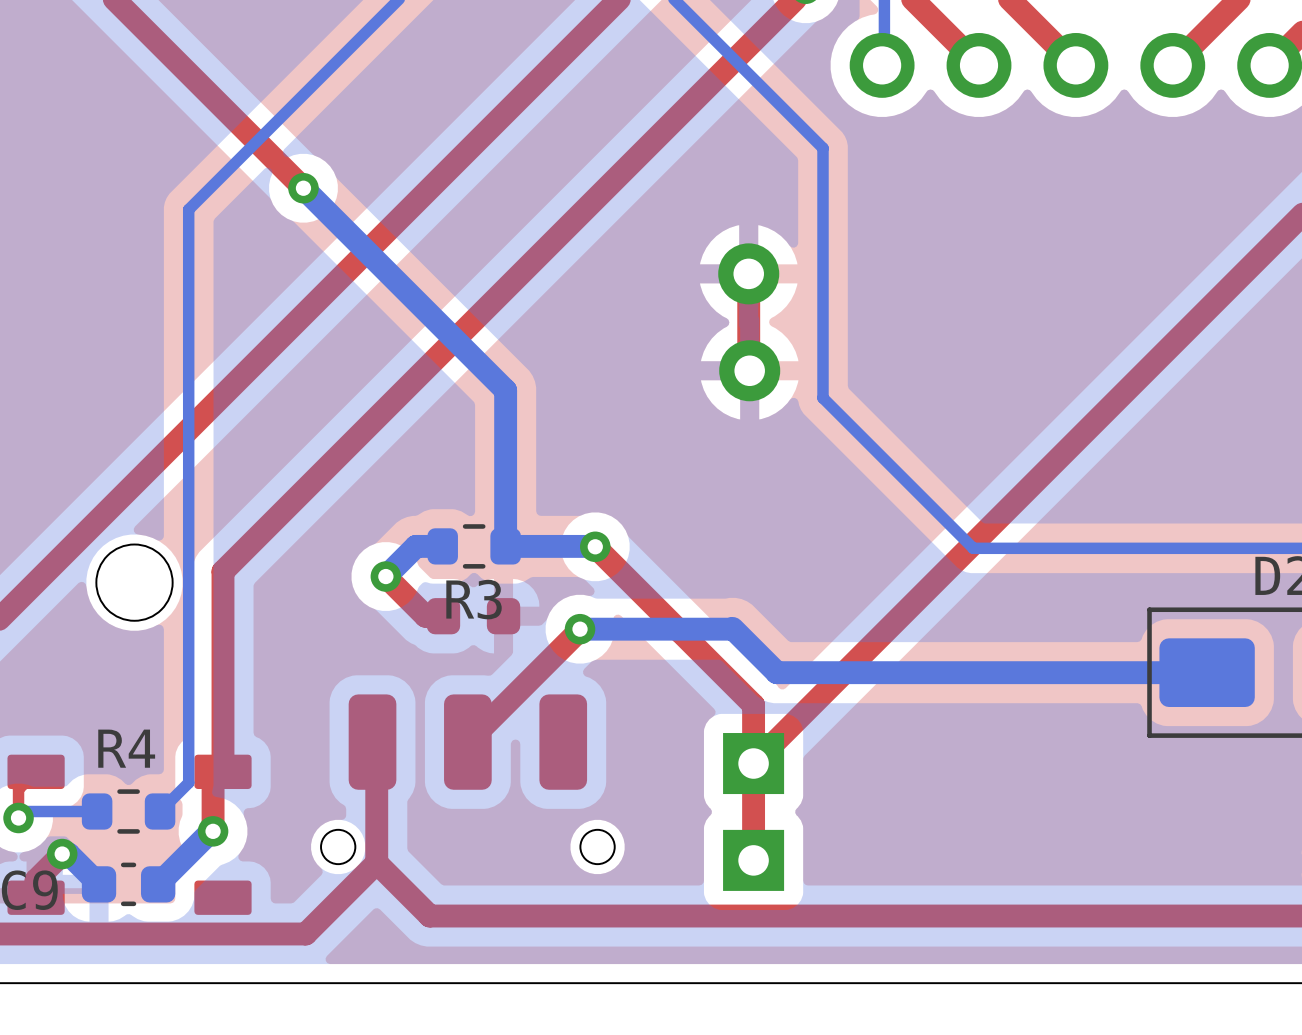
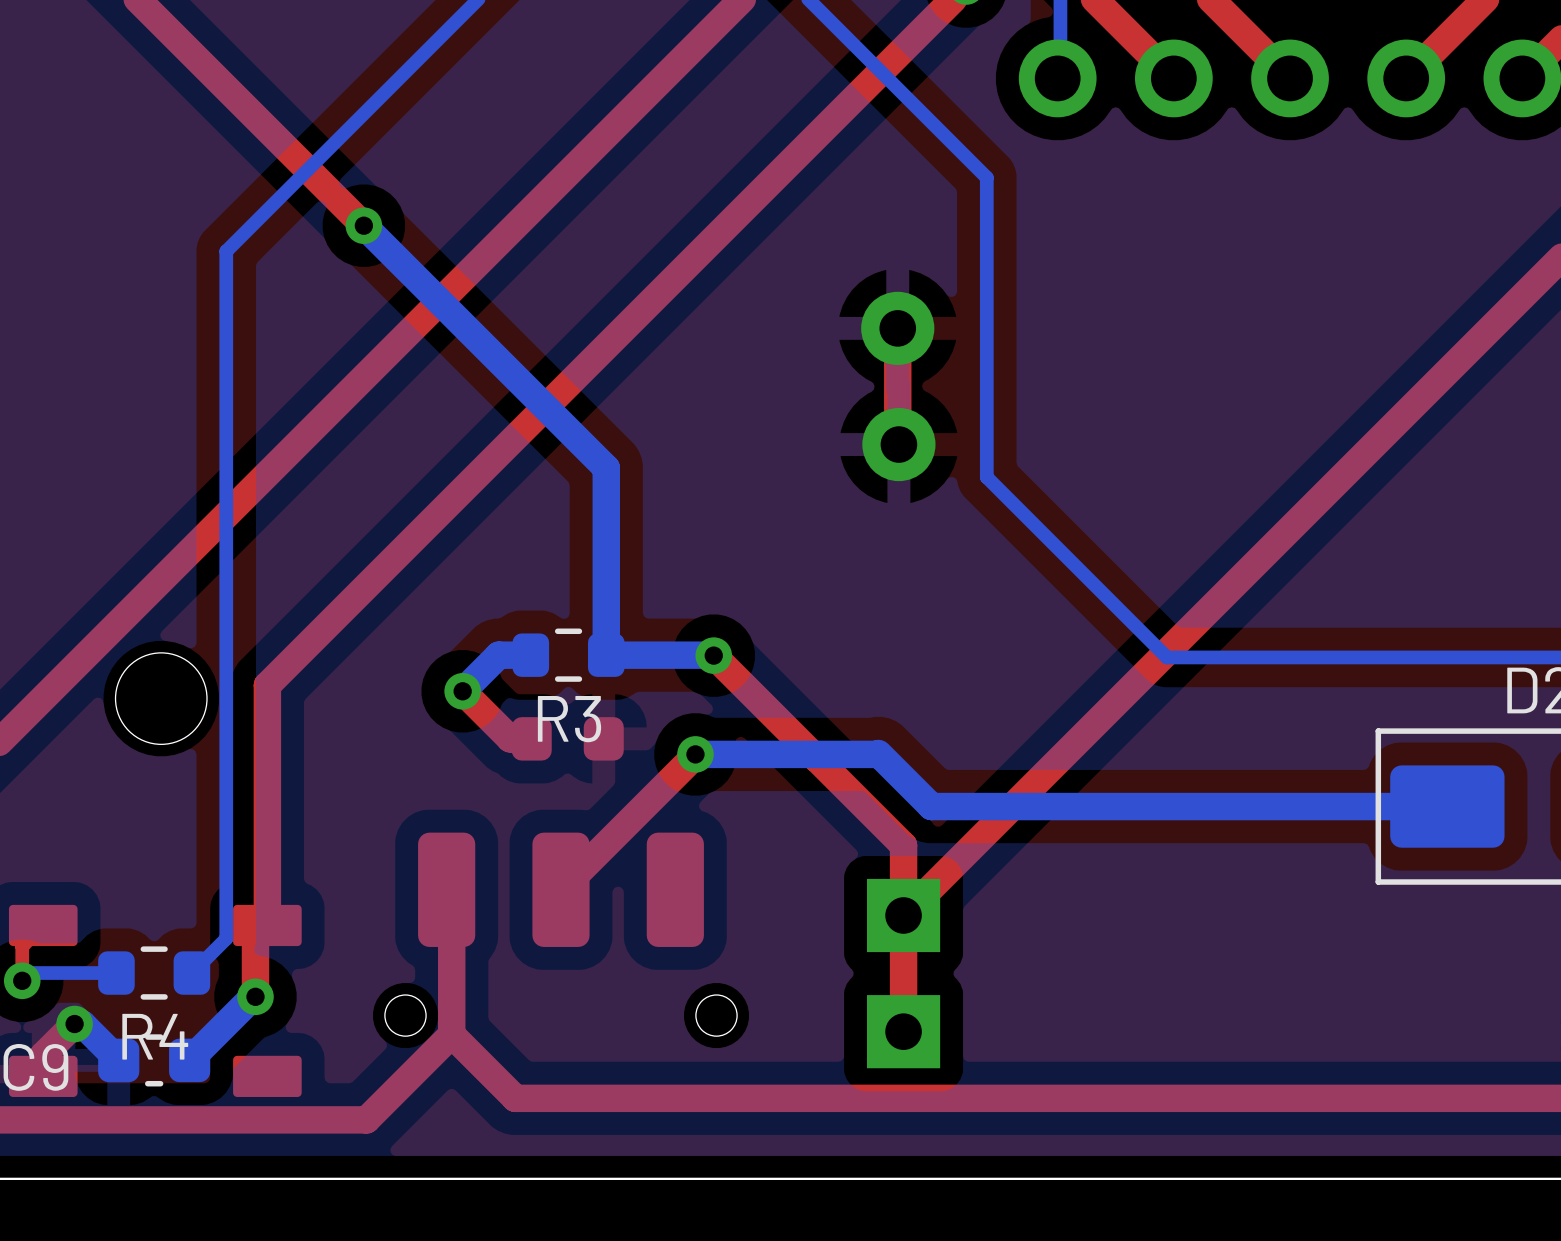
R4 name position: R4 (126, 748) -> R4 (155, 1036)

